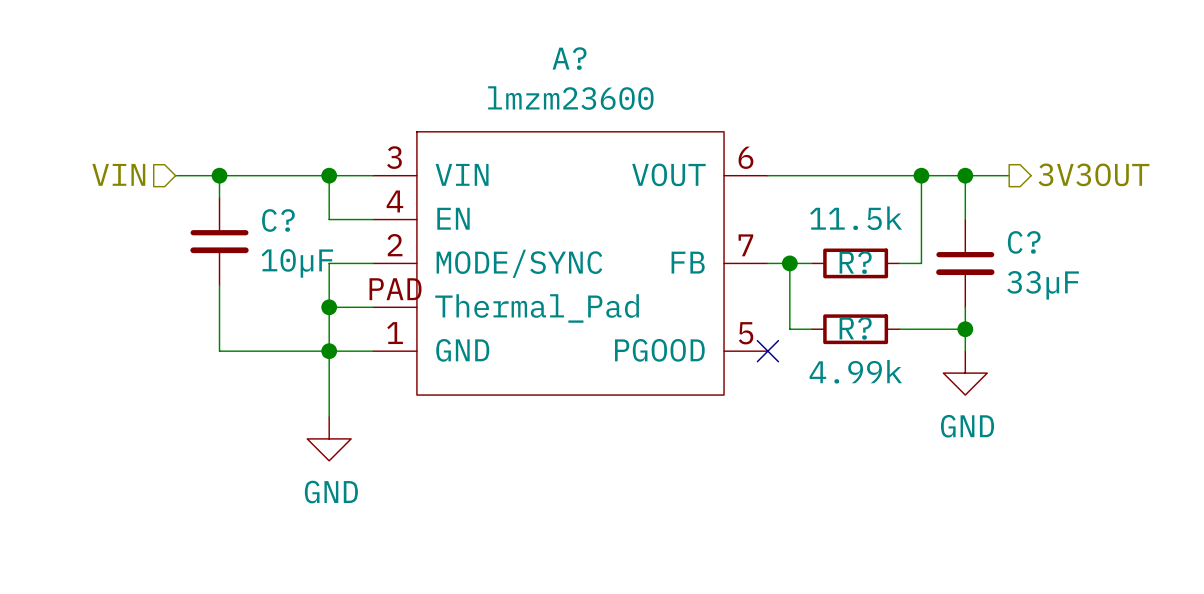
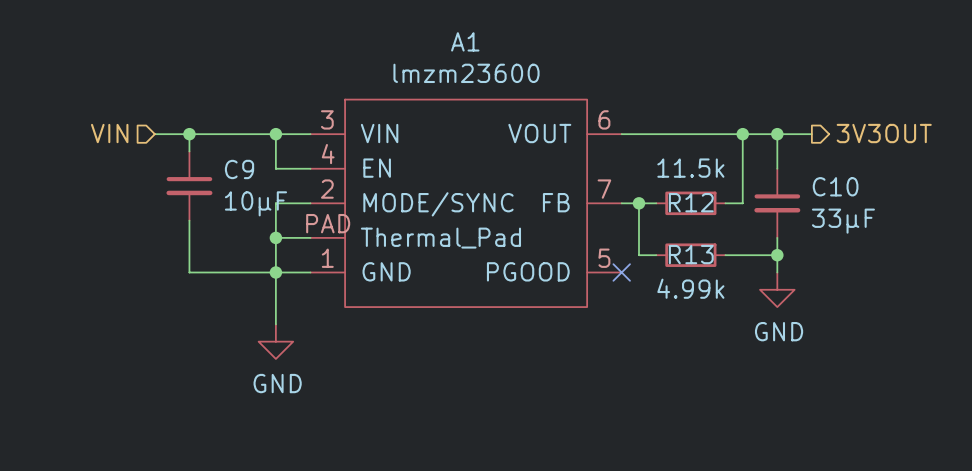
A? name: A? (569, 58) -> A1 (465, 41)
C? name: C? (278, 220) -> C9 (239, 169)
C? name: C? (1024, 242) -> C10 (835, 186)
R? name: R? (855, 262) -> R12 (691, 202)
R? name: R? (855, 328) -> R13 (691, 254)

